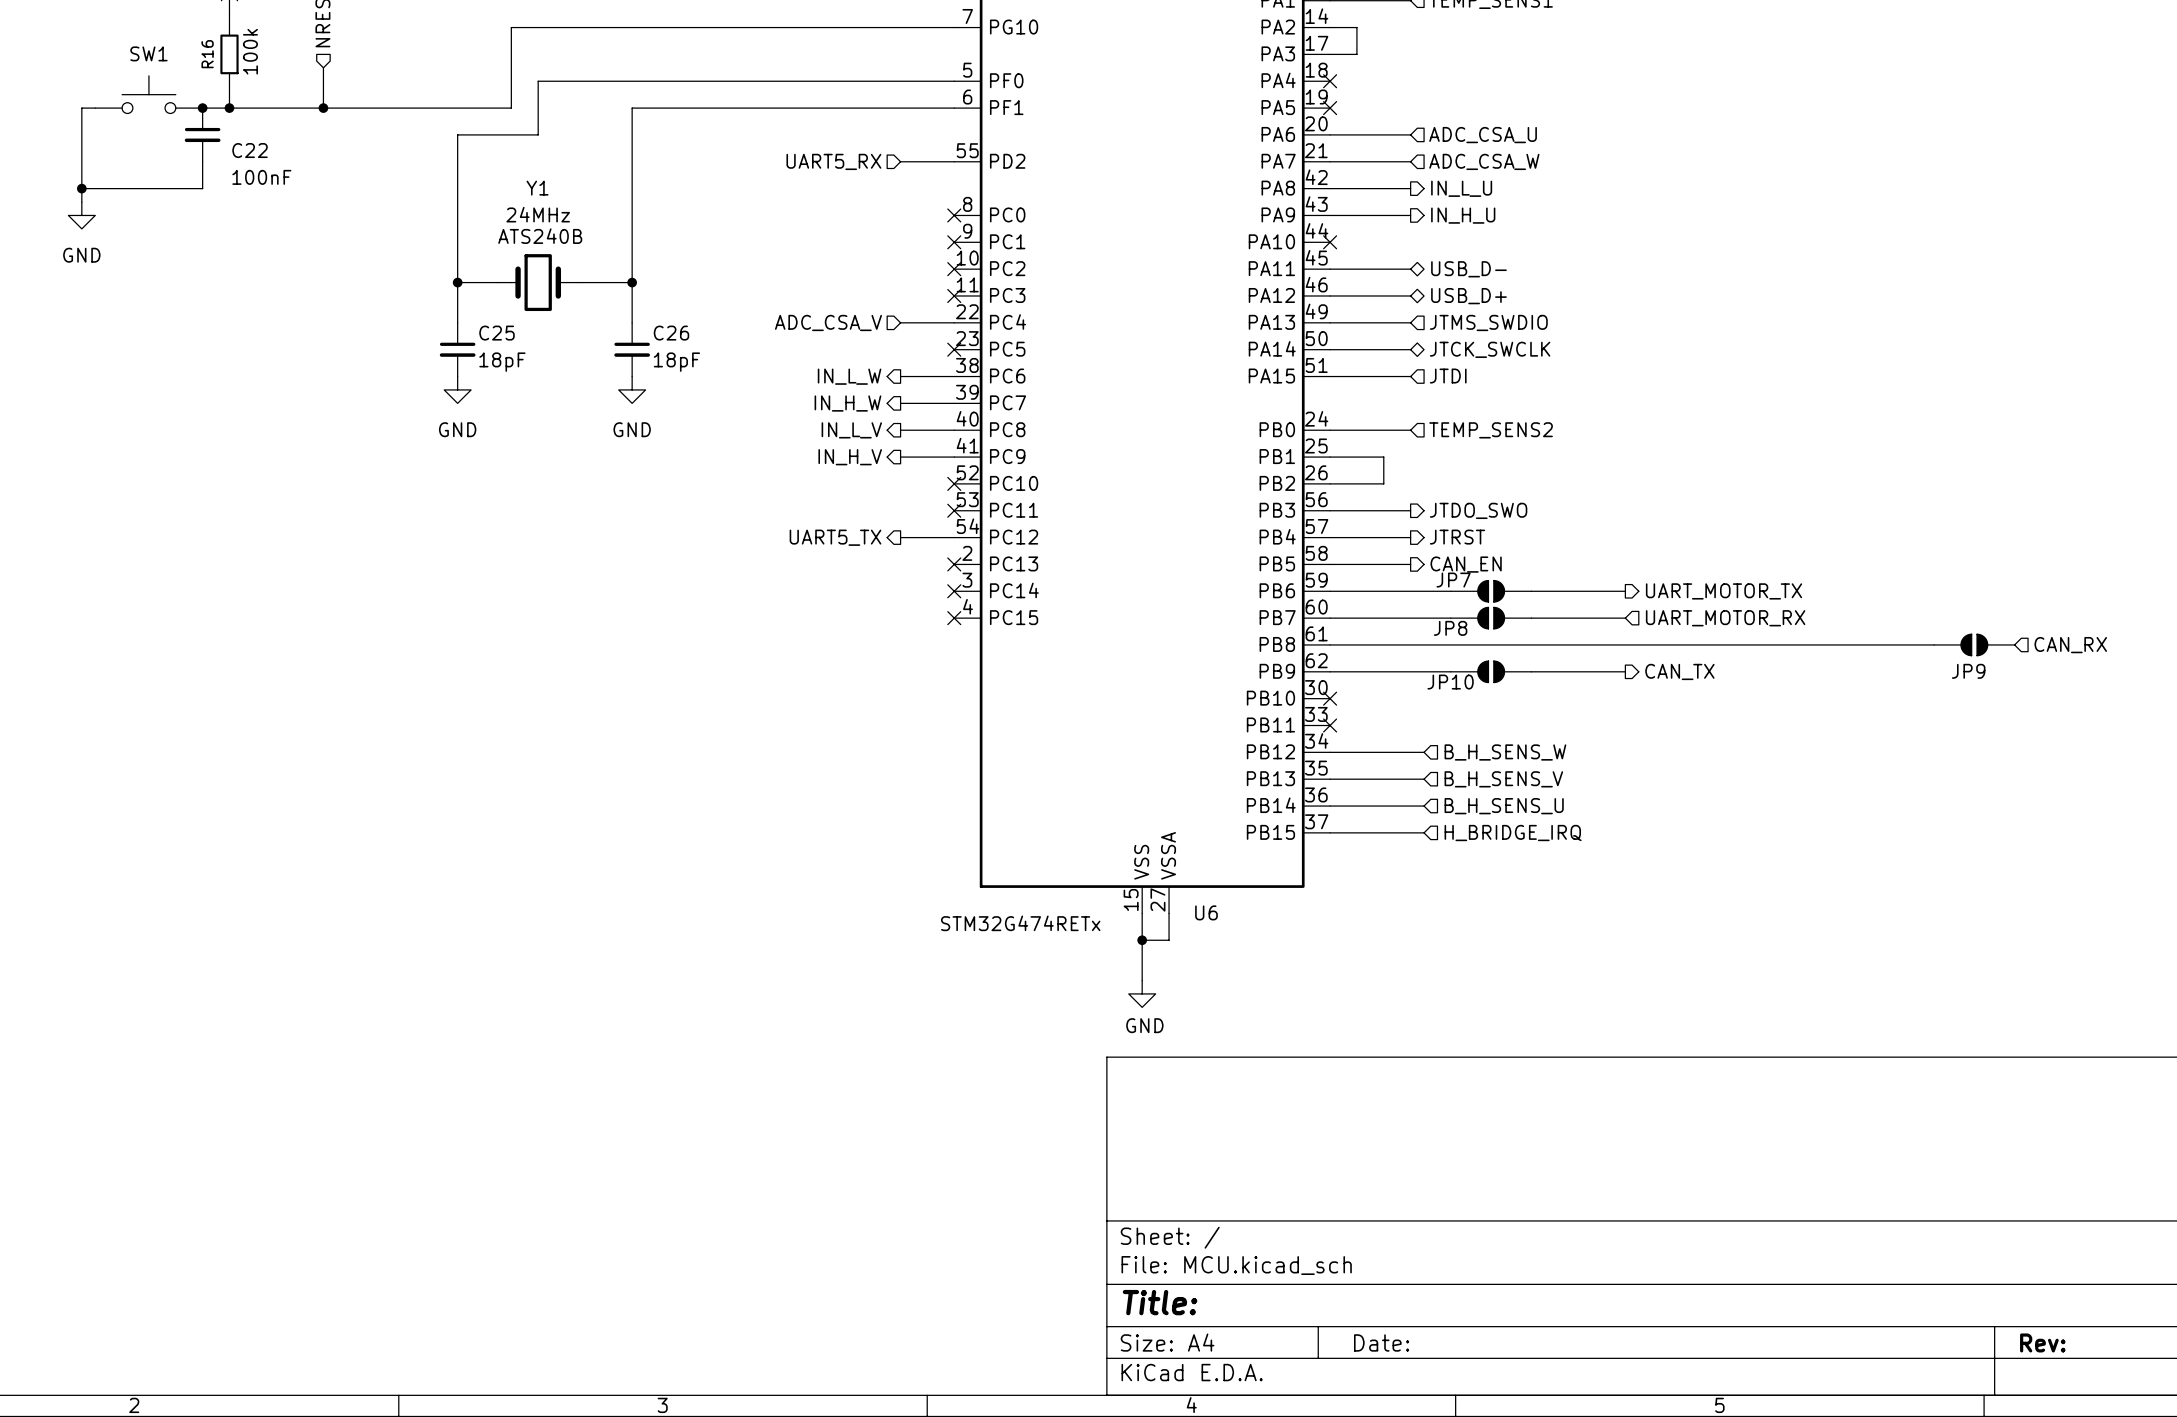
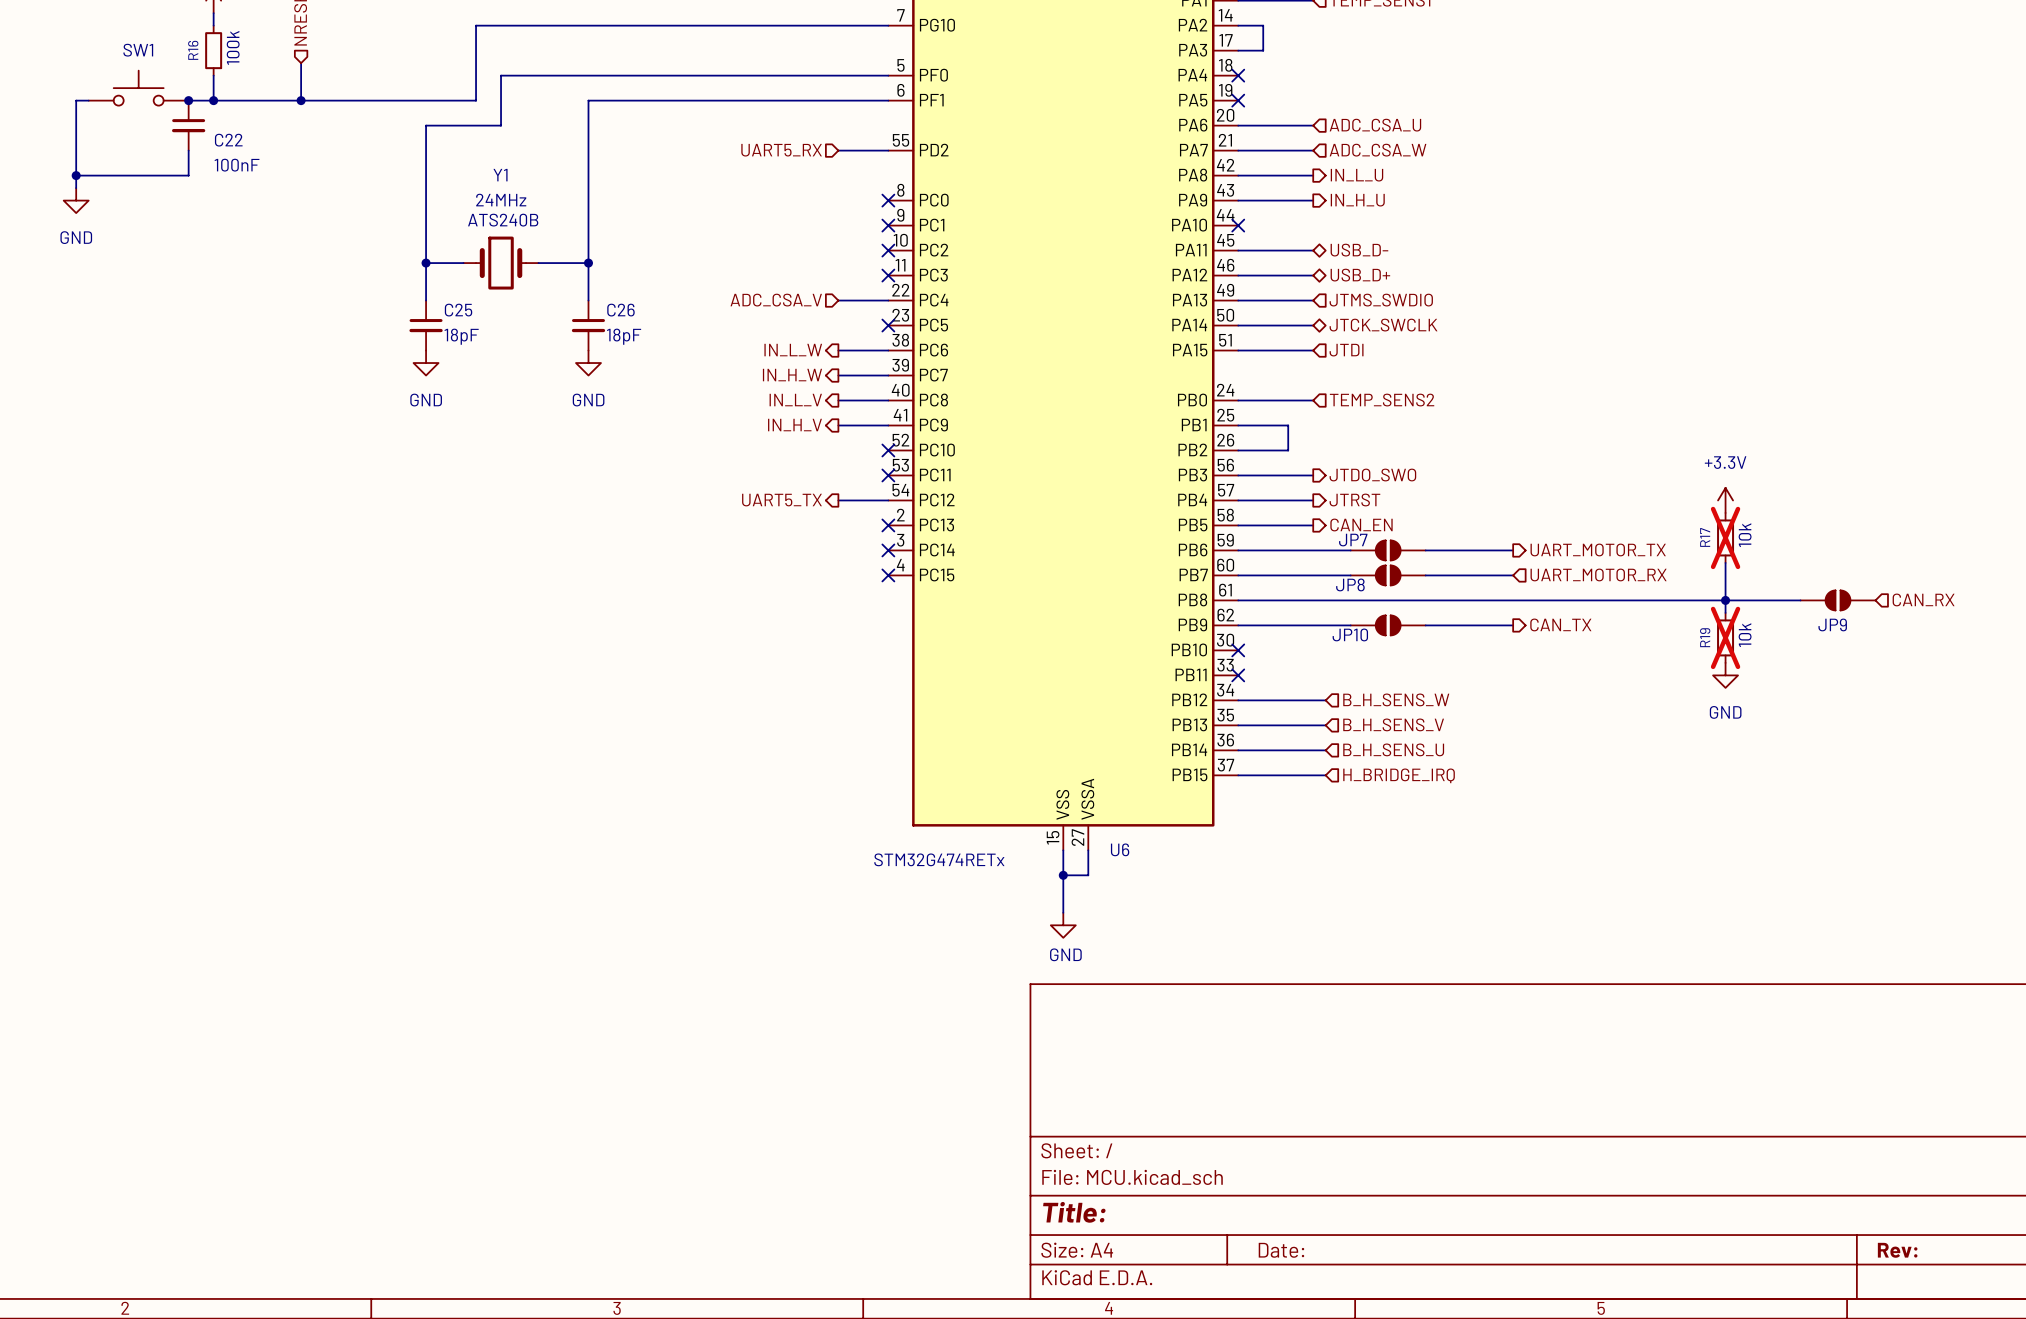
power symbol: none -> +3.3V (1725, 500)
R17: none -> 10k (1725, 537)
wire: none -> (1725, 562) (1725, 612)
junction: none -> (1725, 600)
R19: none -> 10k (1725, 637)
power symbol: none -> GND (1725, 675)

